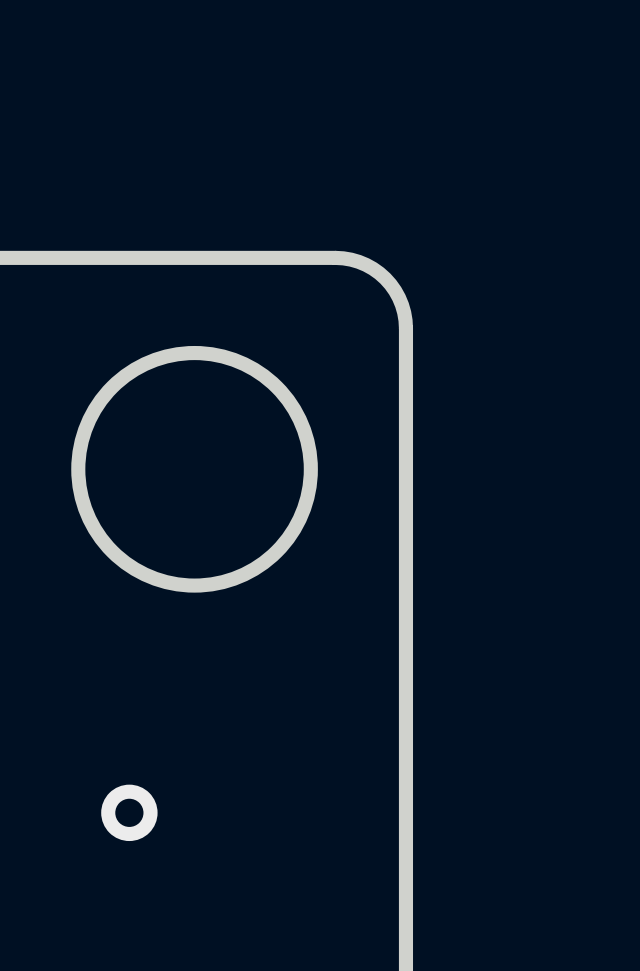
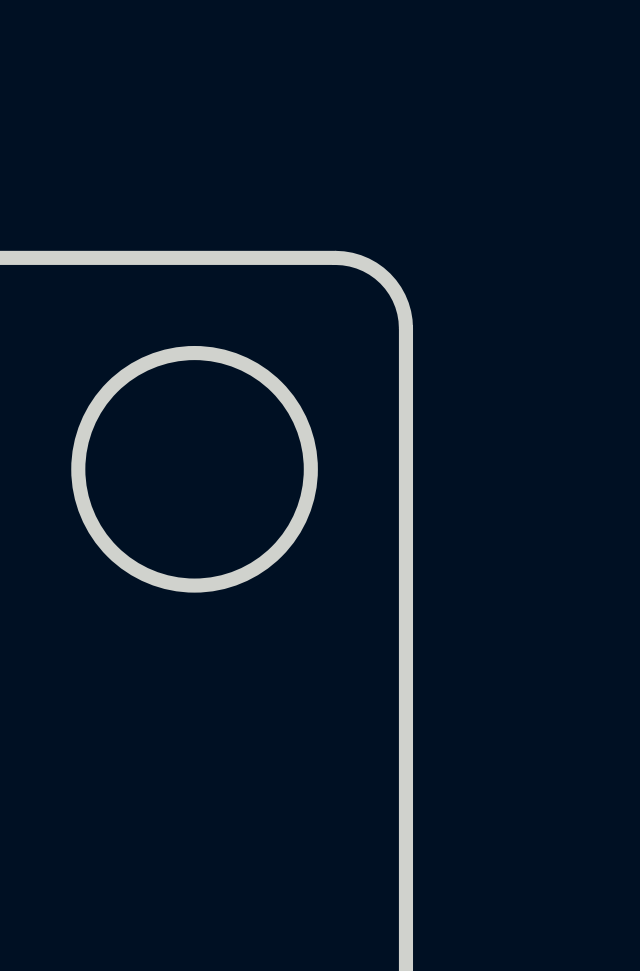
via: (129, 812) -> none

